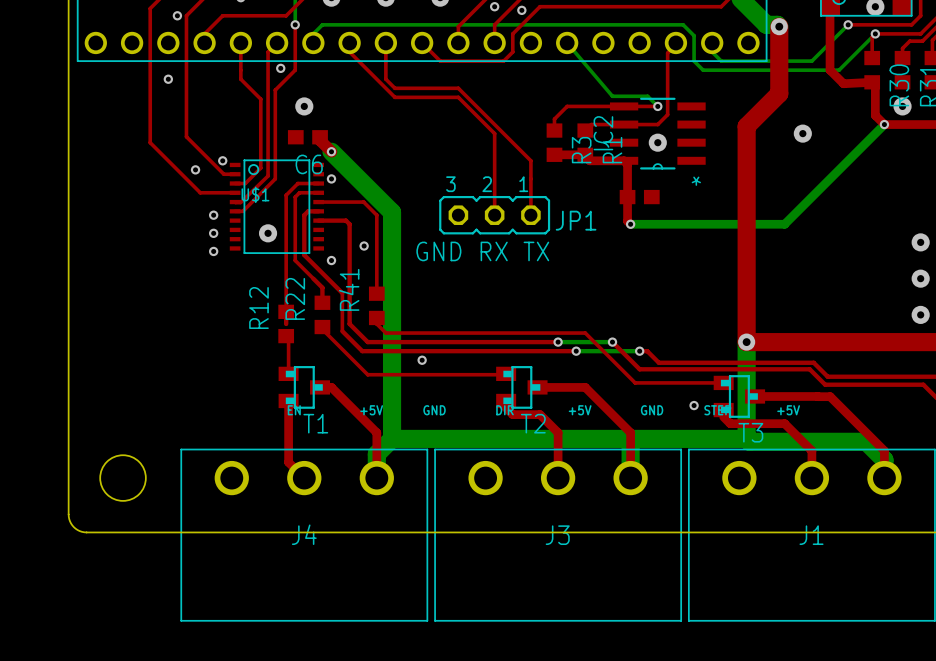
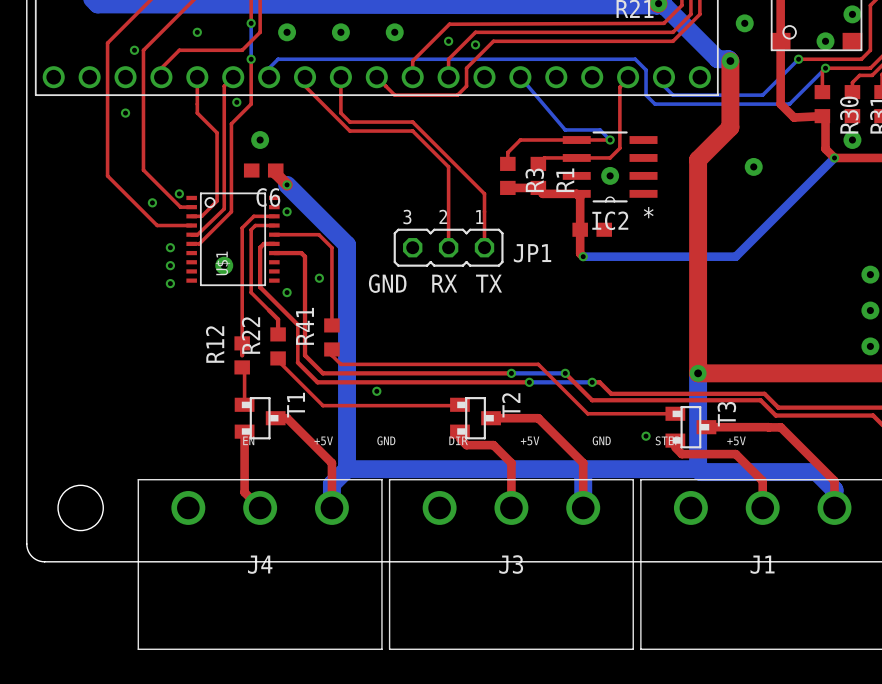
IC2 name rotation: 0° (603, 133) -> 90° clockwise (610, 220)
IC2 name position: IC2 (603, 133) -> IC2 (610, 220)
U$1 name rotation: 0° (255, 194) -> 90° counterclockwise (222, 263)
T1 name rotation: 0° (315, 423) -> 90° counterclockwise (296, 405)
T1 name position: T1 (315, 423) -> T1 (296, 405)
T2 name rotation: 0° (533, 423) -> 90° counterclockwise (511, 405)
T2 name position: T2 (533, 423) -> T2 (511, 405)
T3 name rotation: 0° (750, 432) -> 90° counterclockwise (726, 414)
T3 name position: T3 (750, 432) -> T3 (726, 414)

